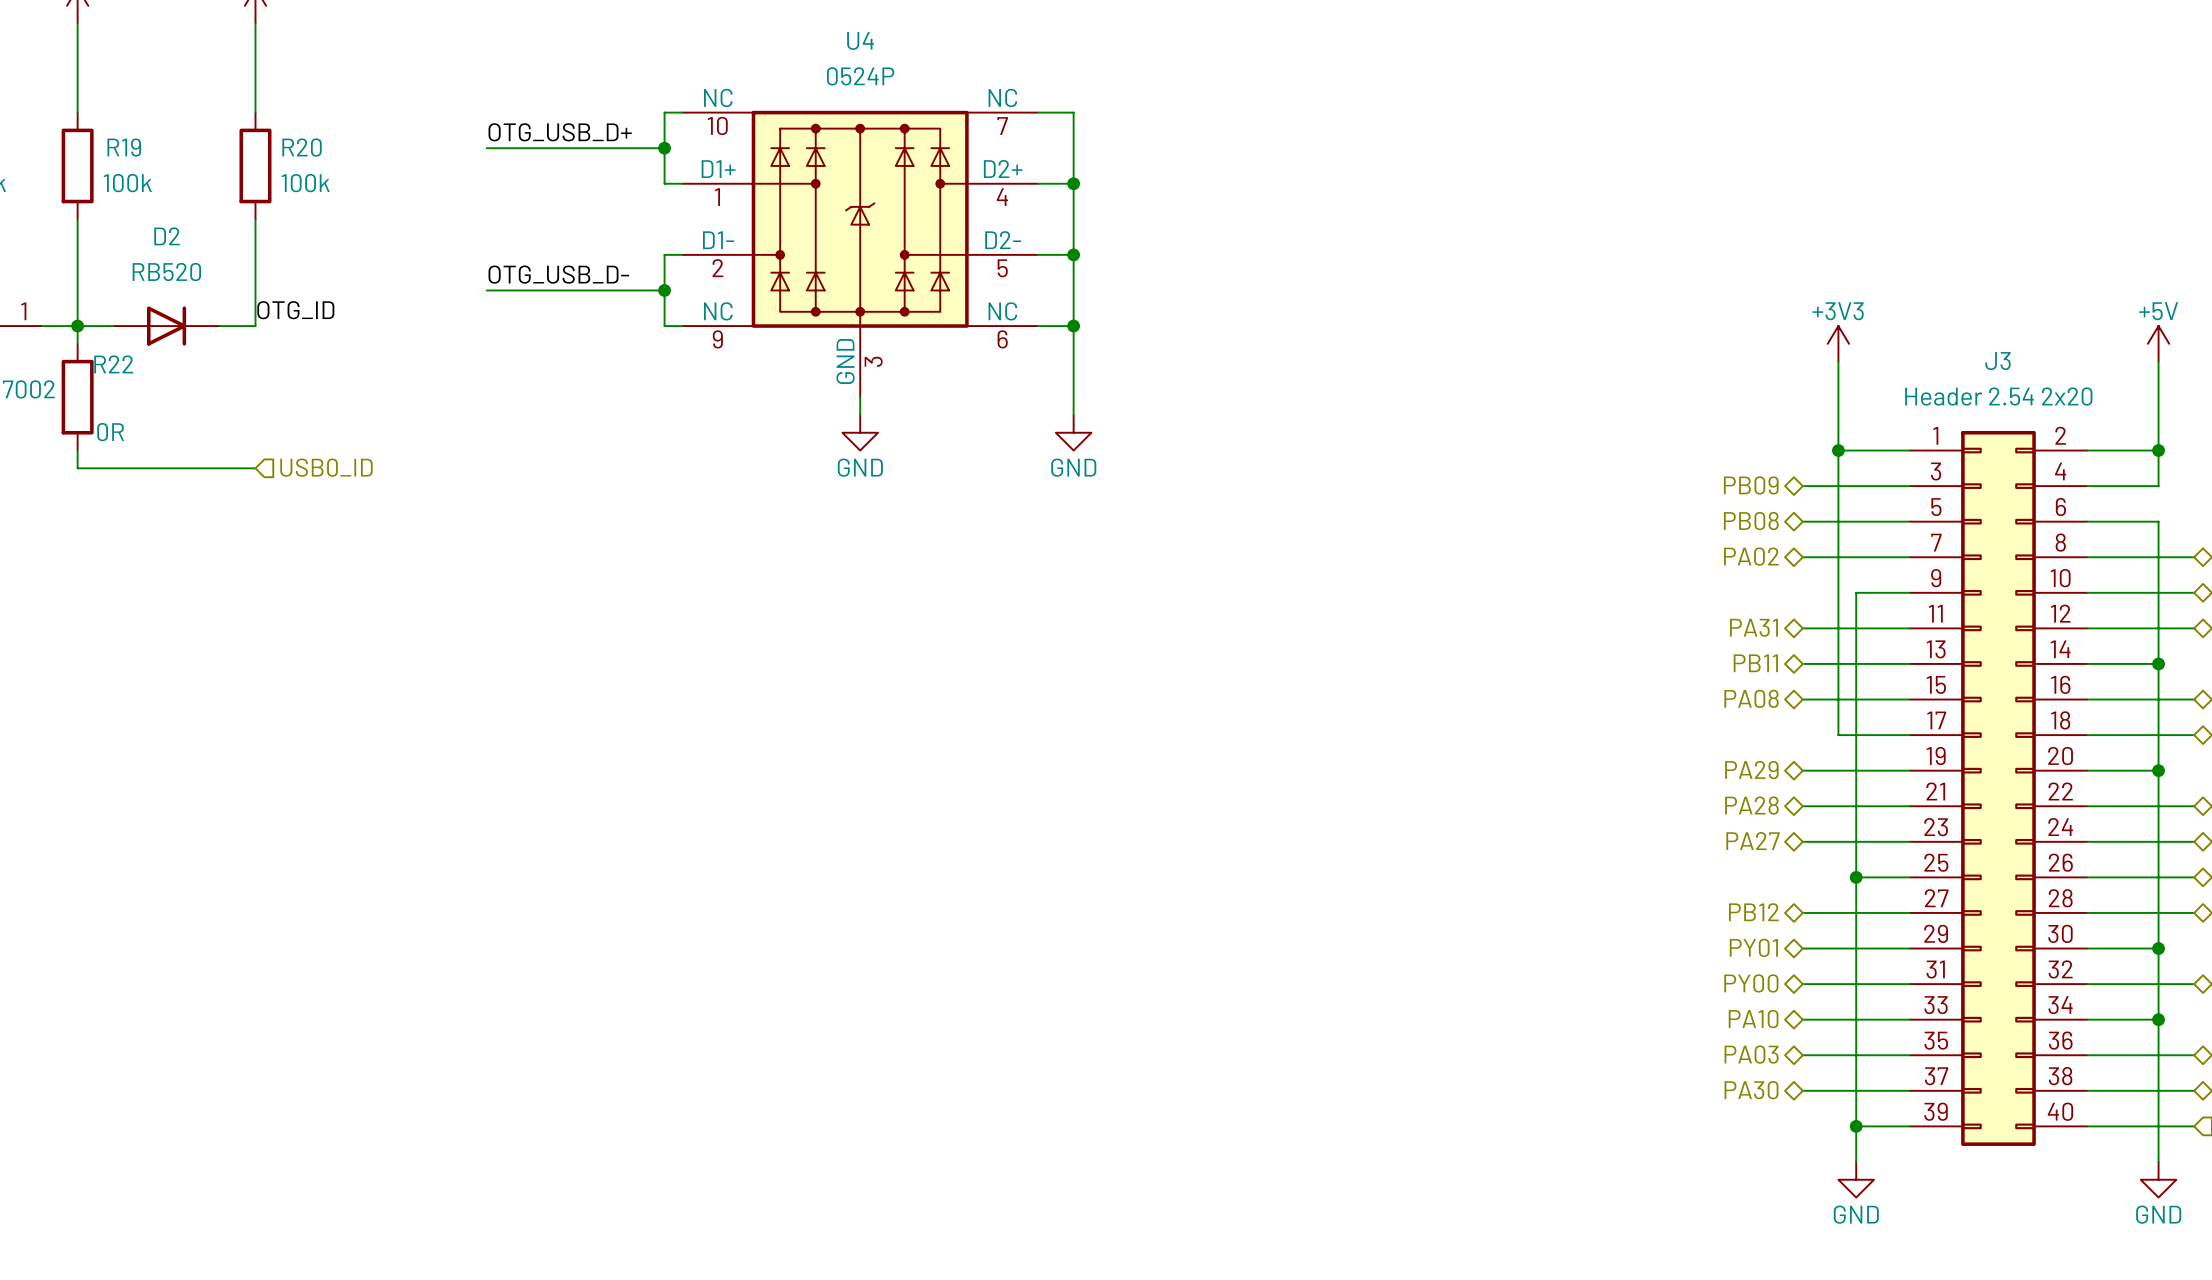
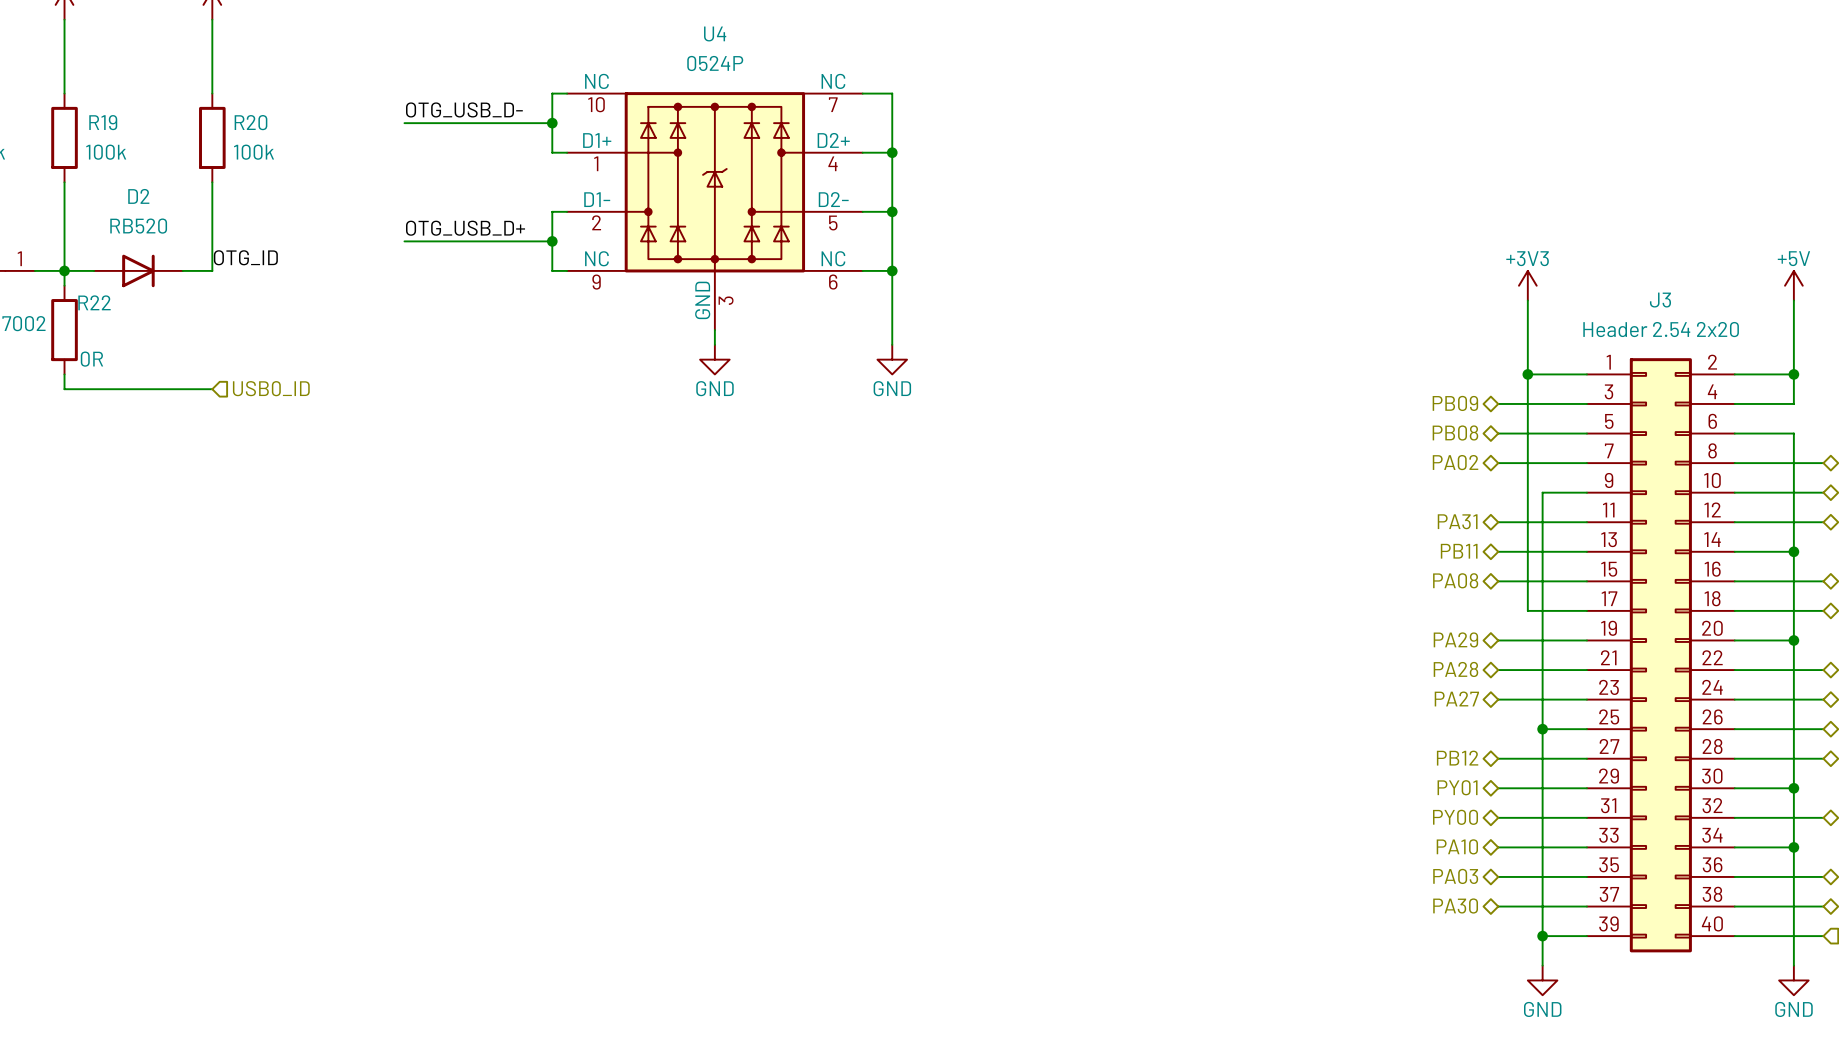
label: OTG_USB_D+ (560, 132) -> OTG_USB_D- (464, 109)
label: OTG_USB_D- (558, 274) -> OTG_USB_D+ (465, 228)

